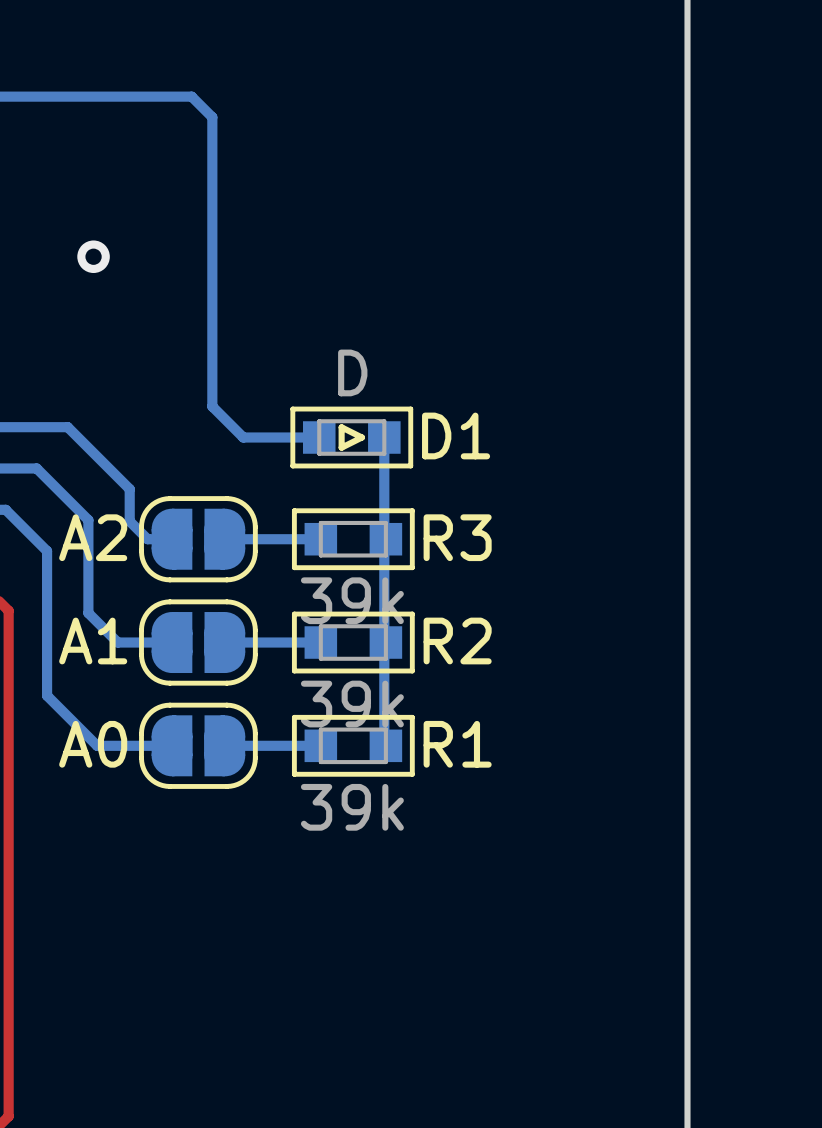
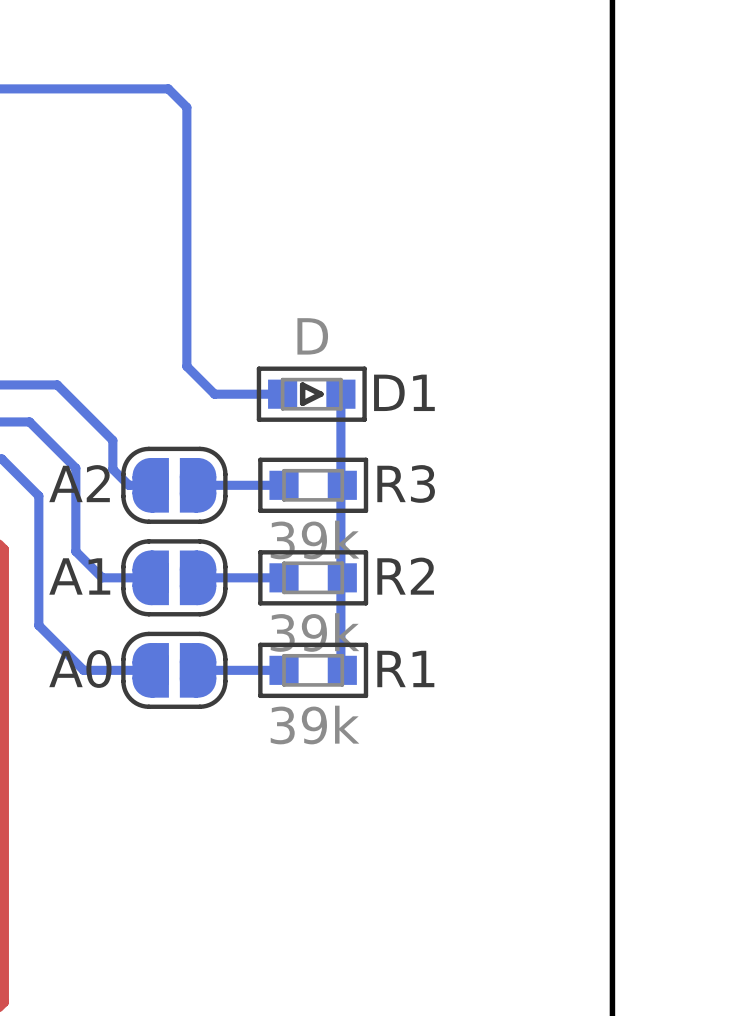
via: (93, 256) -> none

